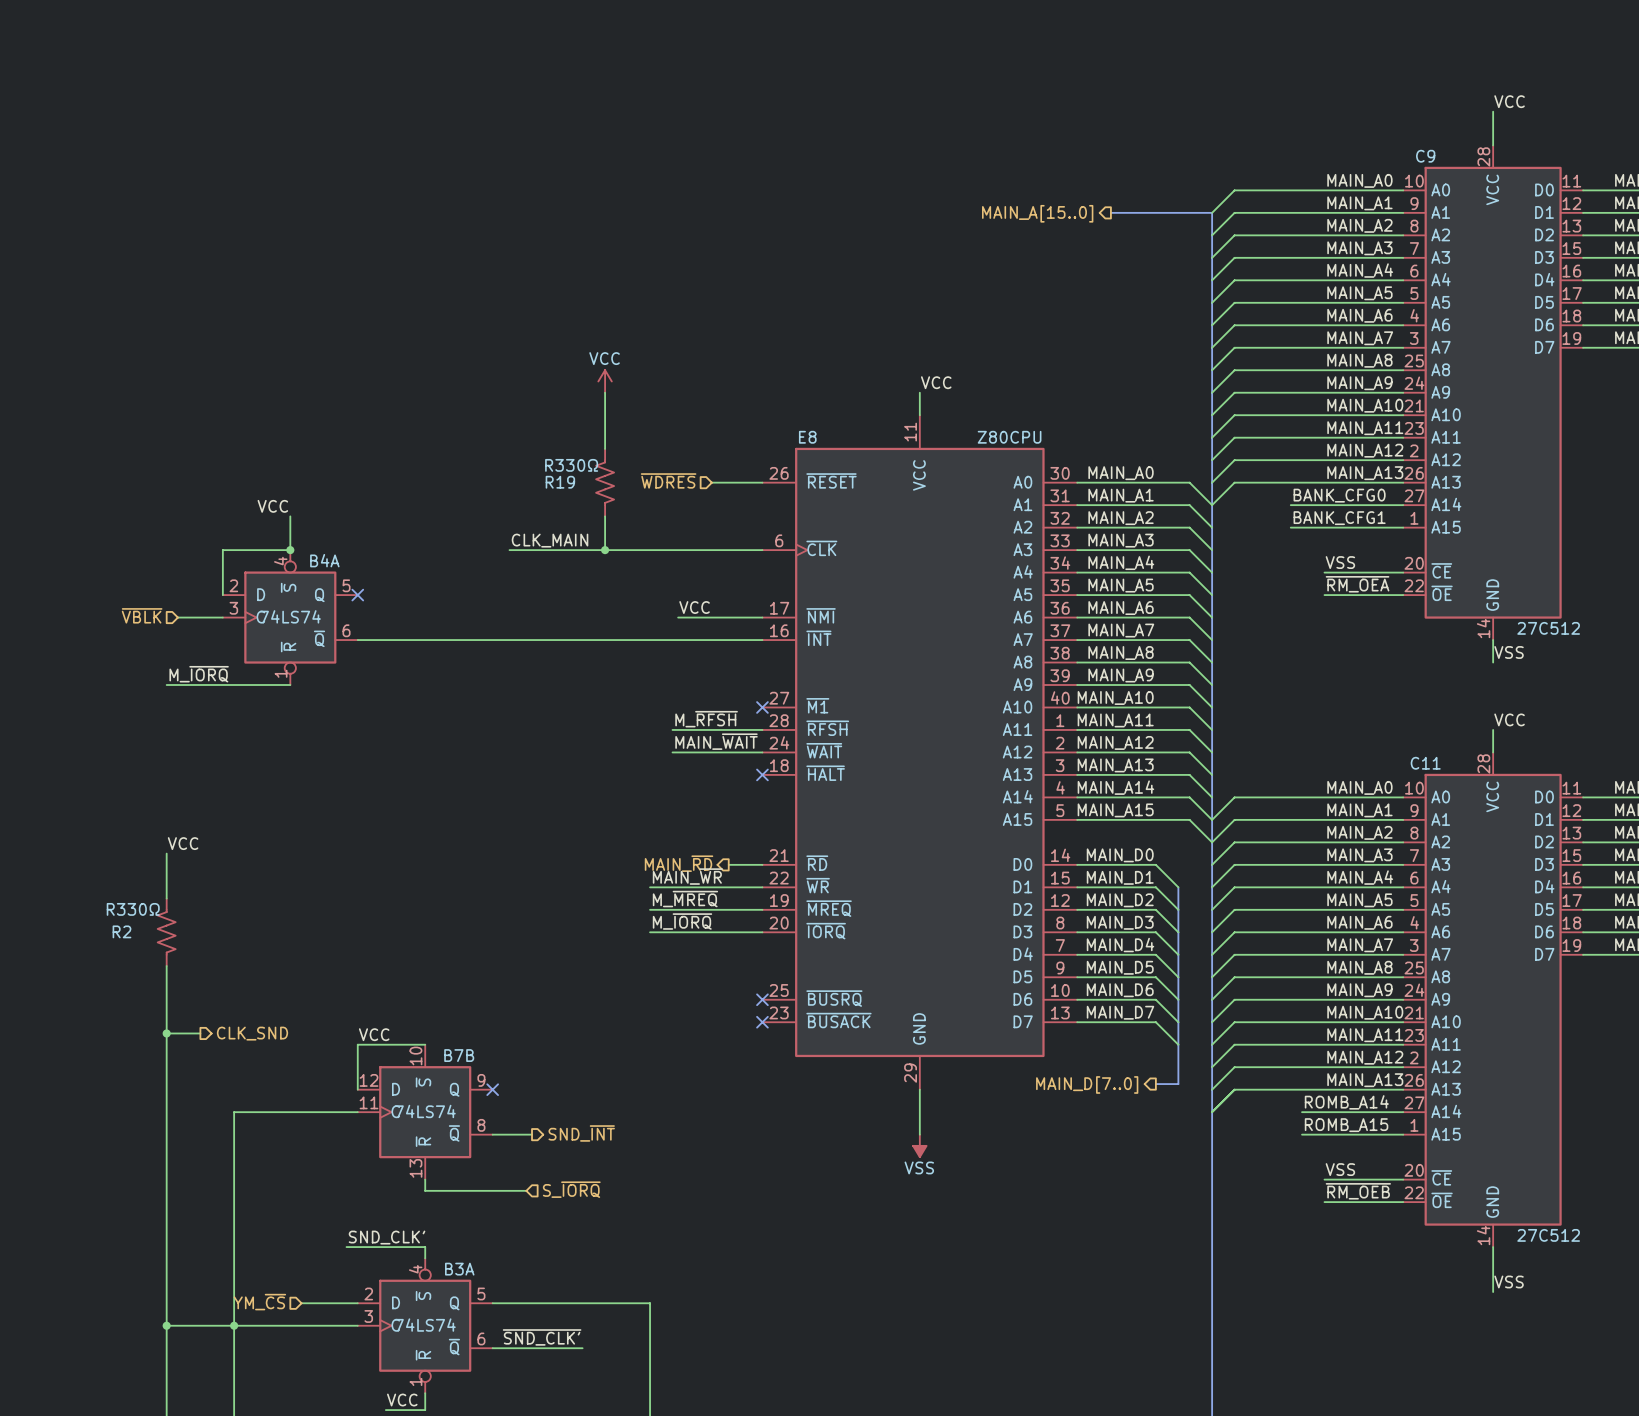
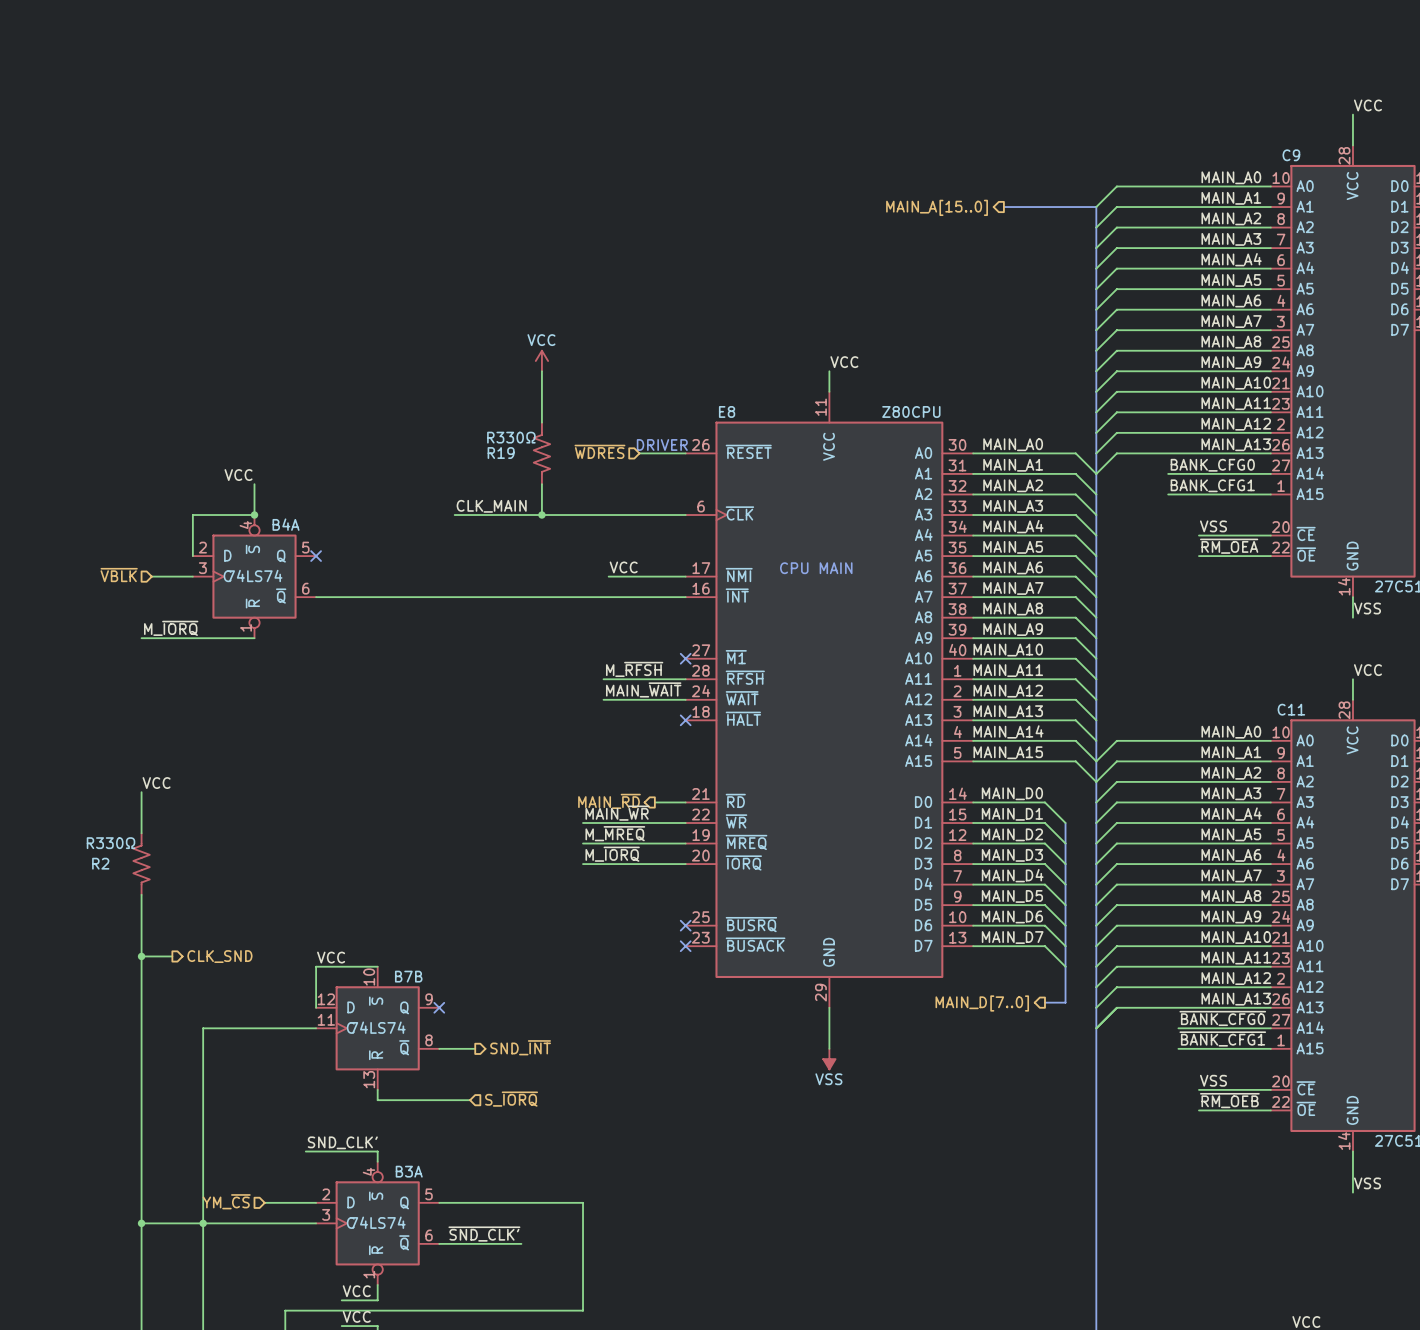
text: none -> DRIVER (662, 445)
text: none -> CPU MAIN (816, 568)
label: ROMB_A14 (1346, 1102) -> ~{BANK_CFG0} (1222, 1018)
label: ROMB_A15 (1346, 1125) -> ~{BANK_CFG1} (1222, 1039)

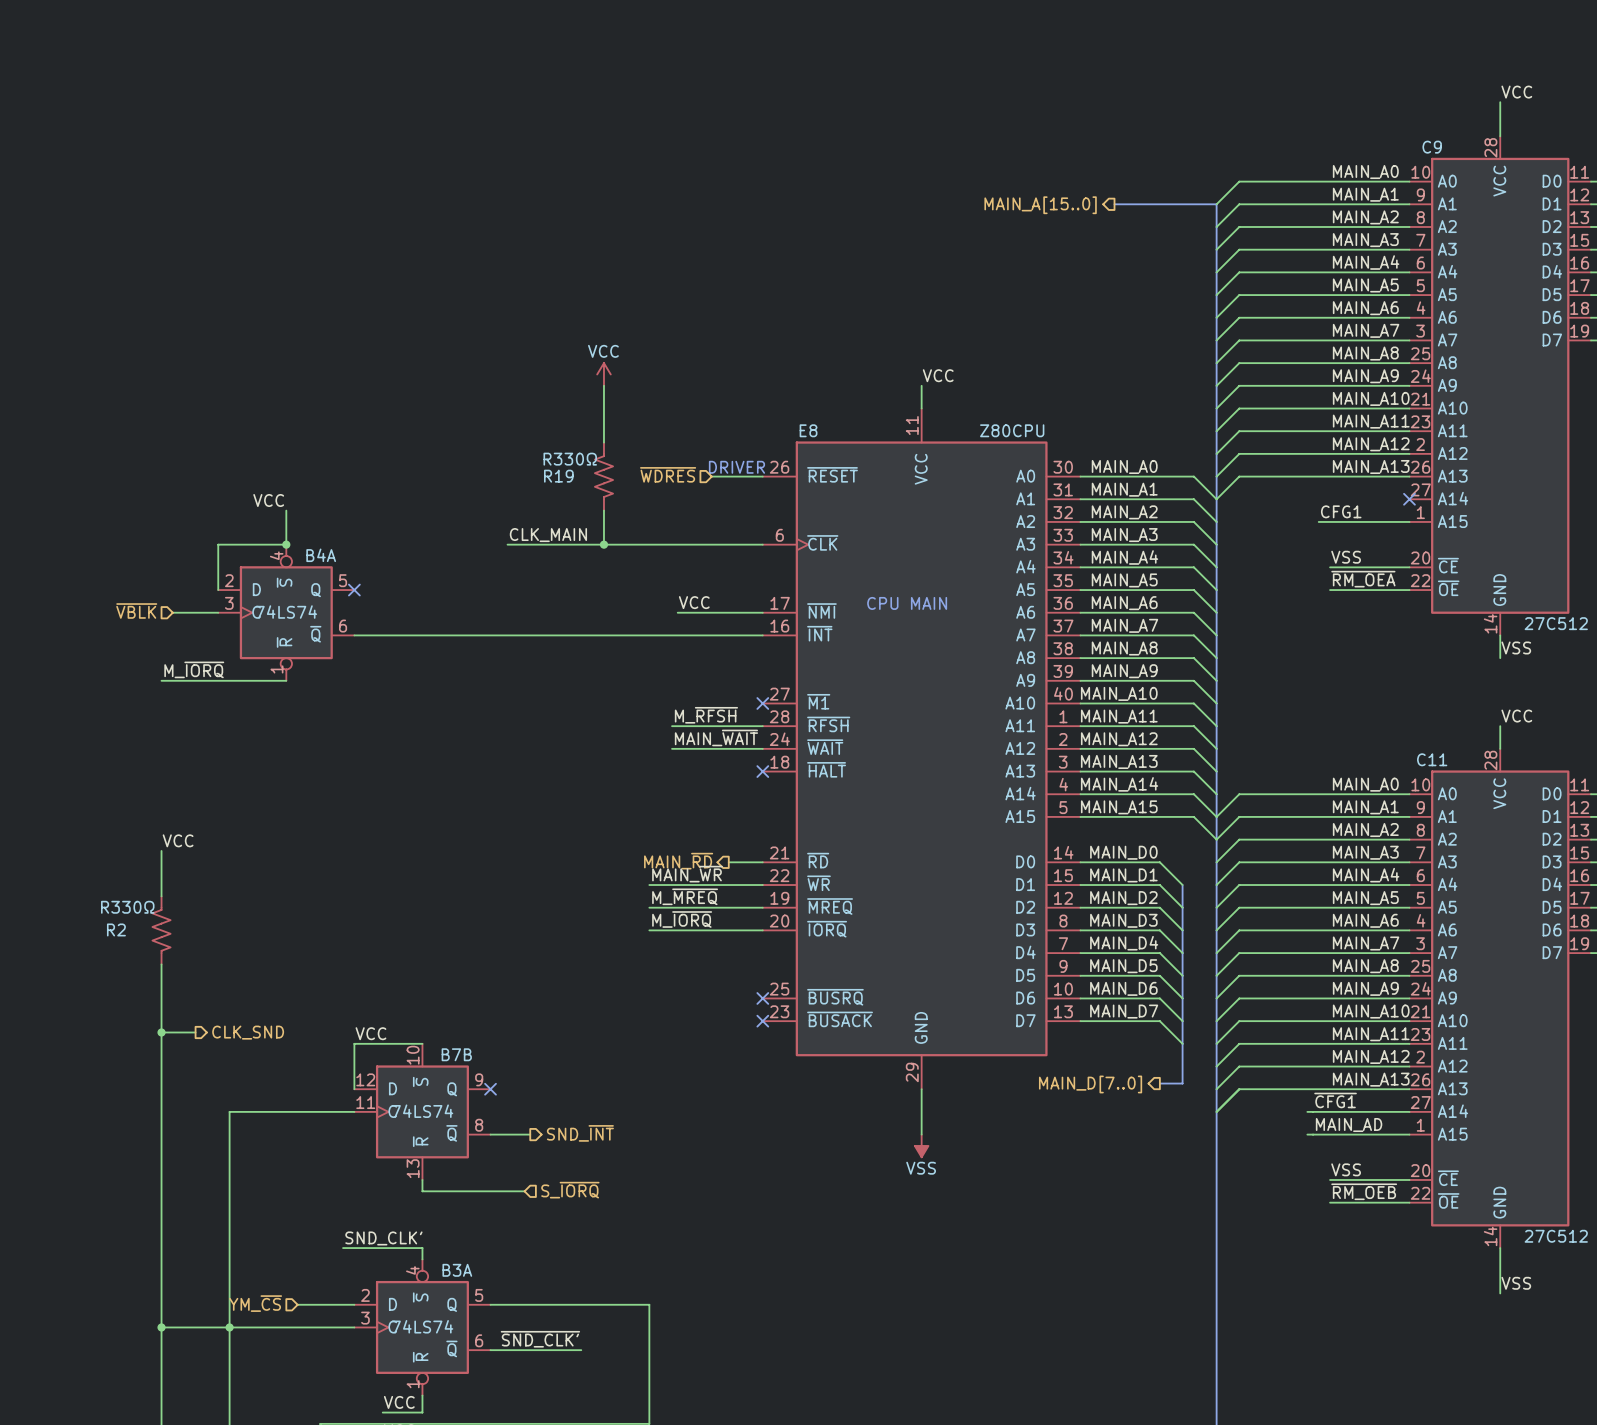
label: BANK_CFG0 (1212, 465) -> none
wire: (1168, 473) (1270, 473) -> none
no-connect mark: none -> (1409, 499)
label: BANK_CFG1 (1212, 485) -> CFG1 (1341, 511)
wire: (1168, 494) (1188, 494) -> none
label: ~{BANK_CFG0} (1222, 1018) -> ~{CFG1} (1335, 1100)
label: ~{BANK_CFG1} (1222, 1039) -> MAIN_AD (1349, 1125)

